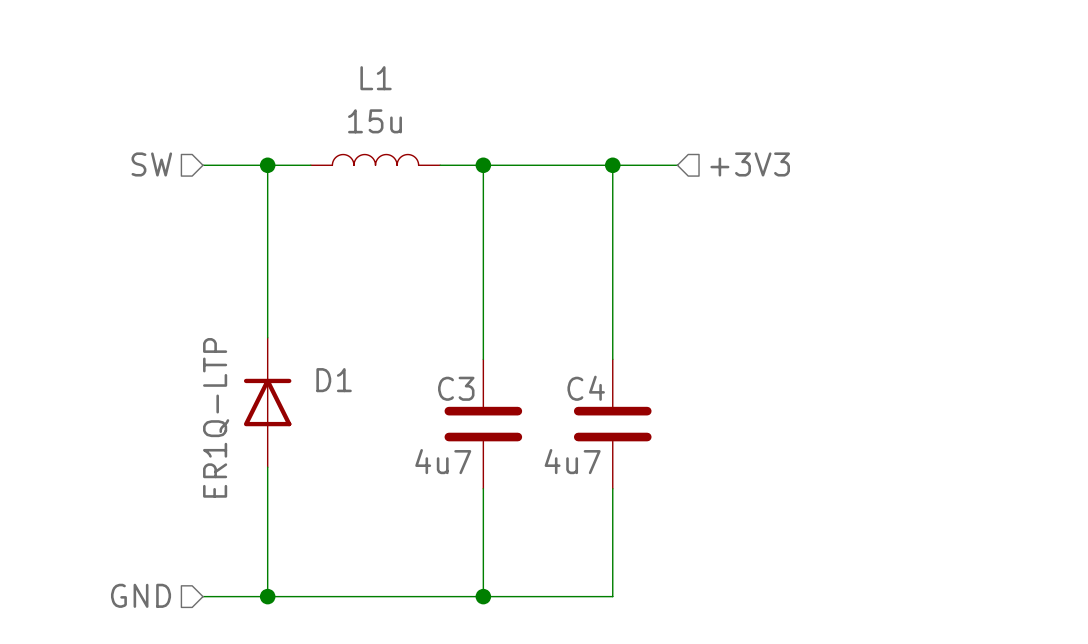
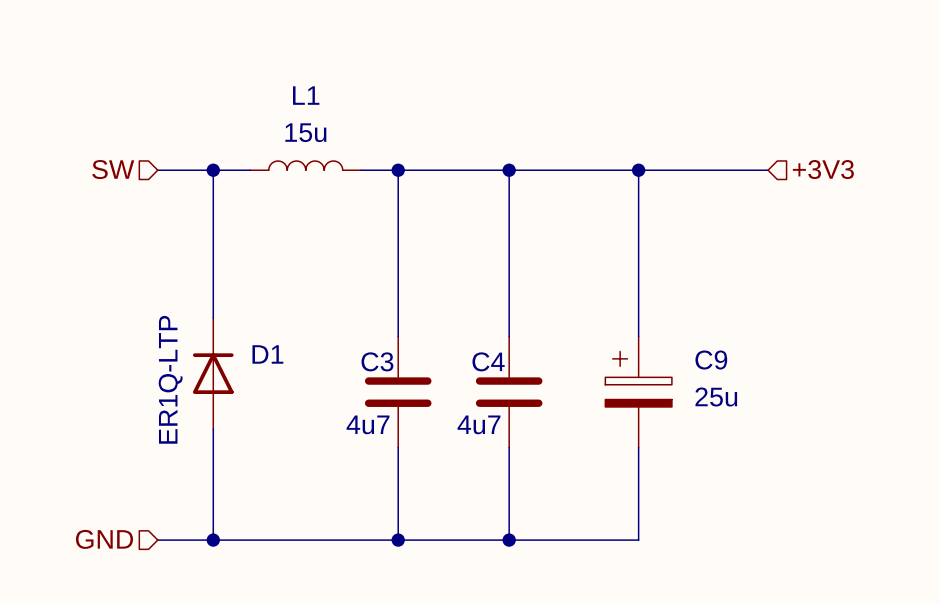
hierarchical label position: +3V3 (750, 164) -> +3V3 (823, 169)
wire: none -> (564, 170) (768, 170)
wire: none -> (638, 170) (638, 336)
junction: none -> (638, 170)
C9: none -> 25u (638, 392)
wire: none -> (638, 447) (638, 540) (509, 540)
junction: none -> (509, 540)

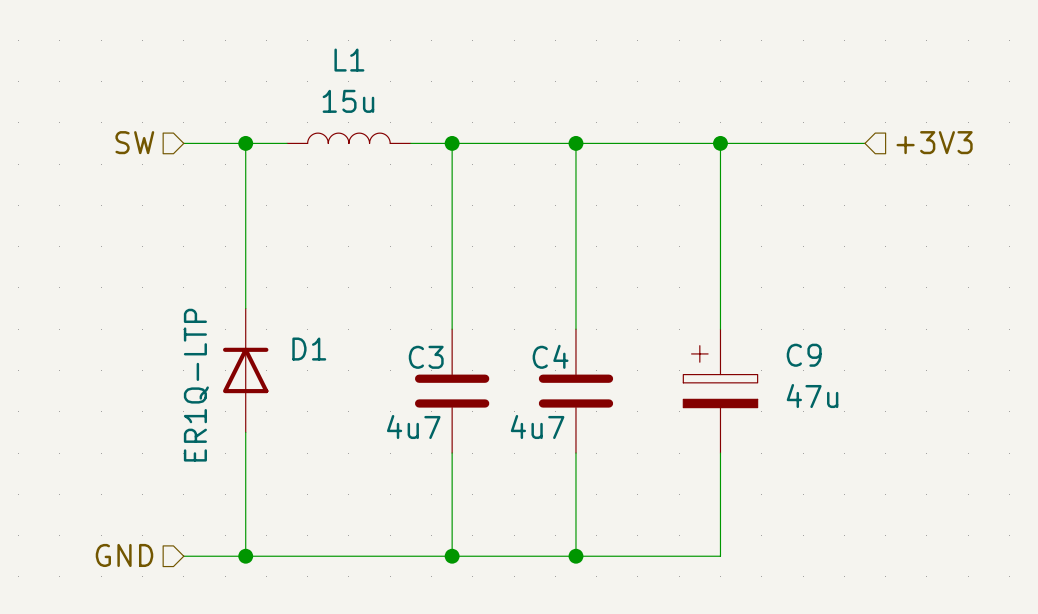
C9 value: 25u (716, 396) -> 47u (812, 396)

